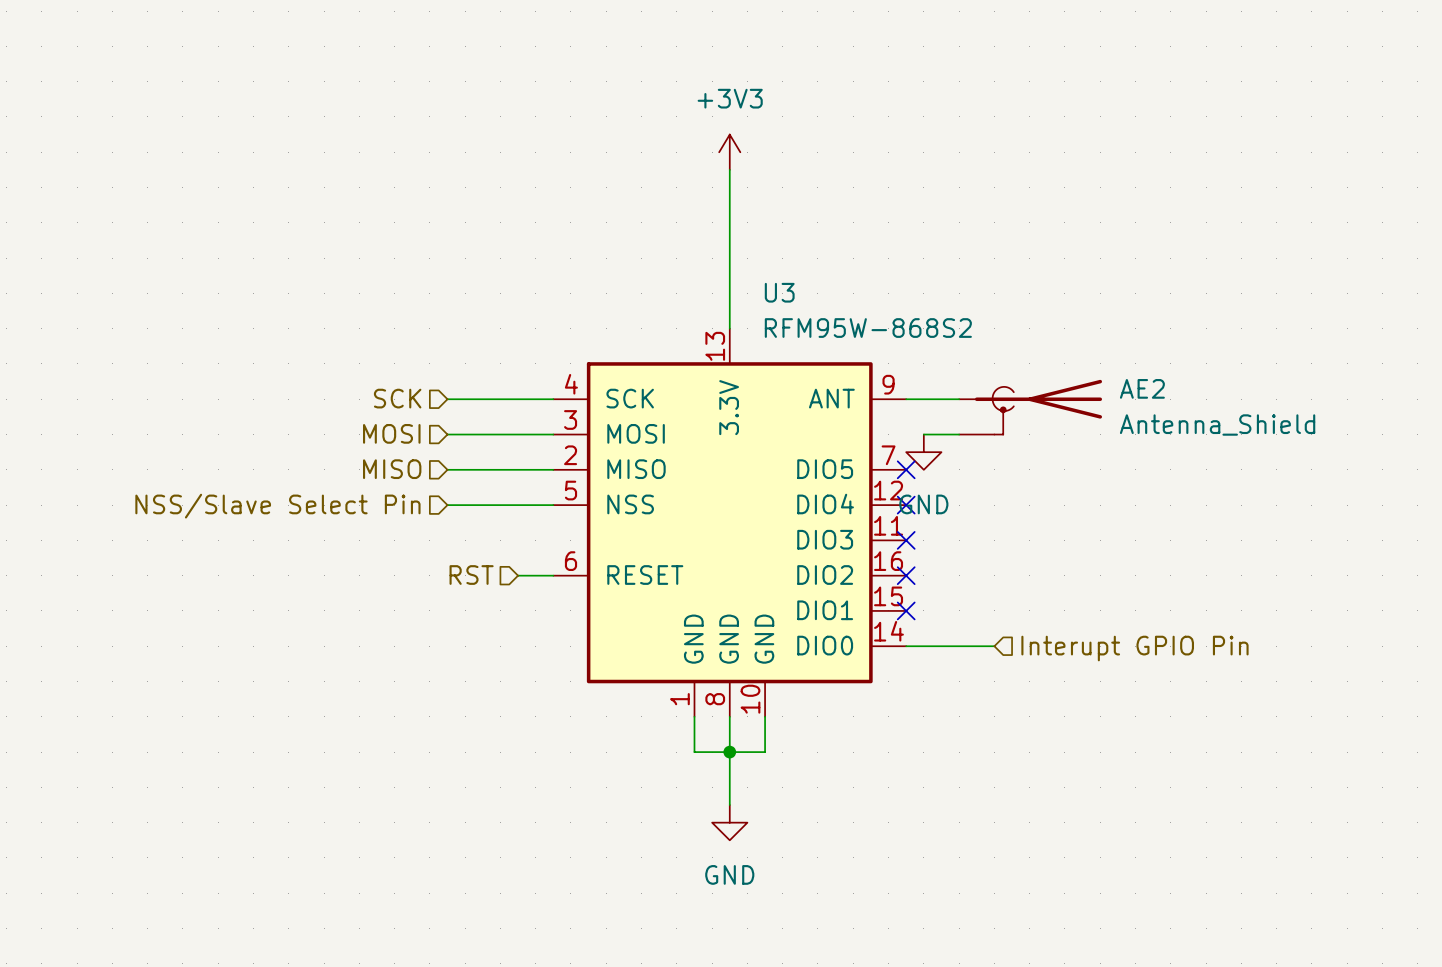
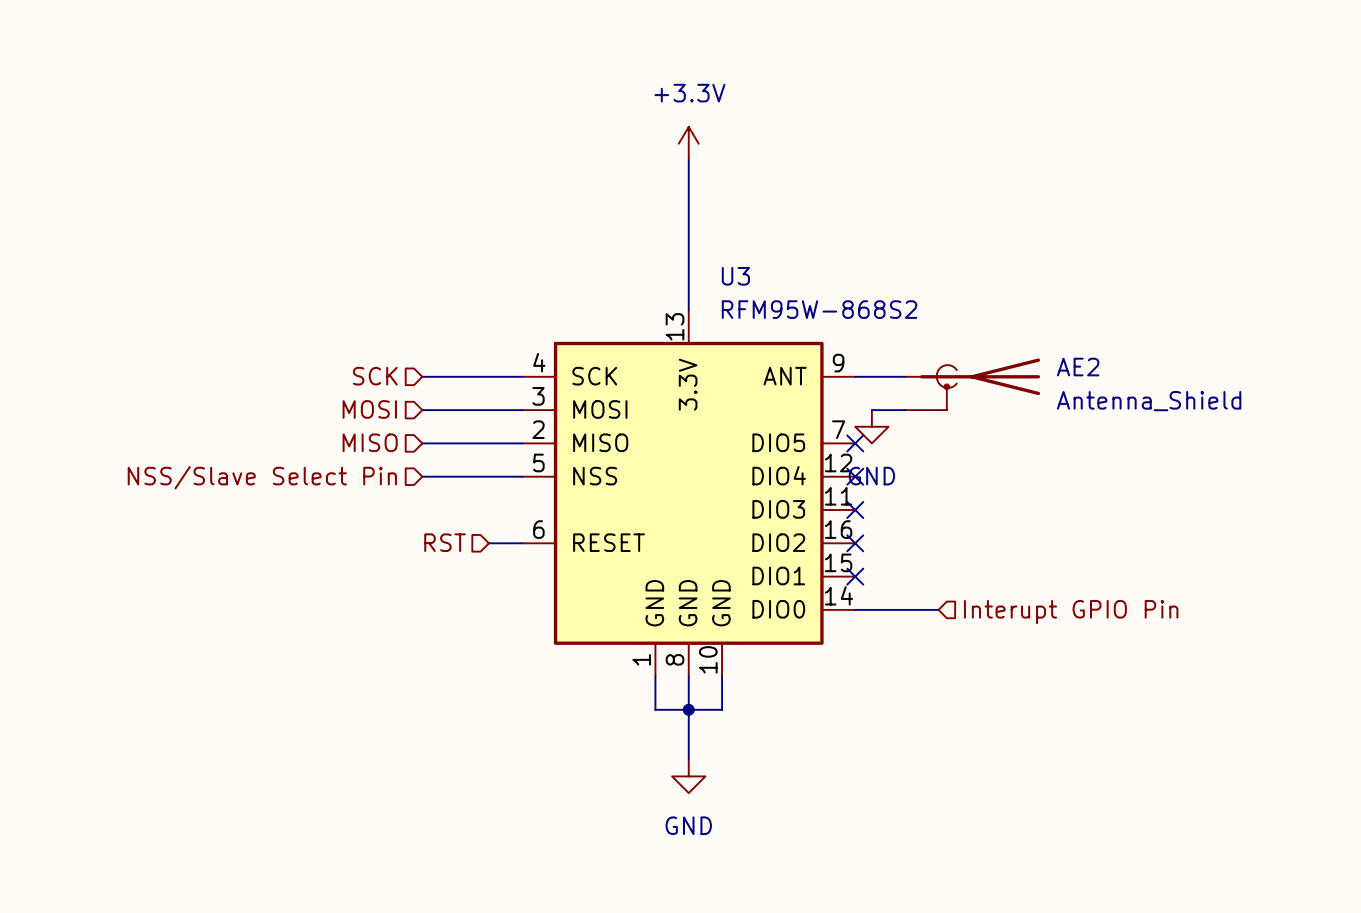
power symbol: +3V3 (729, 152) -> +3.3V (688, 143)

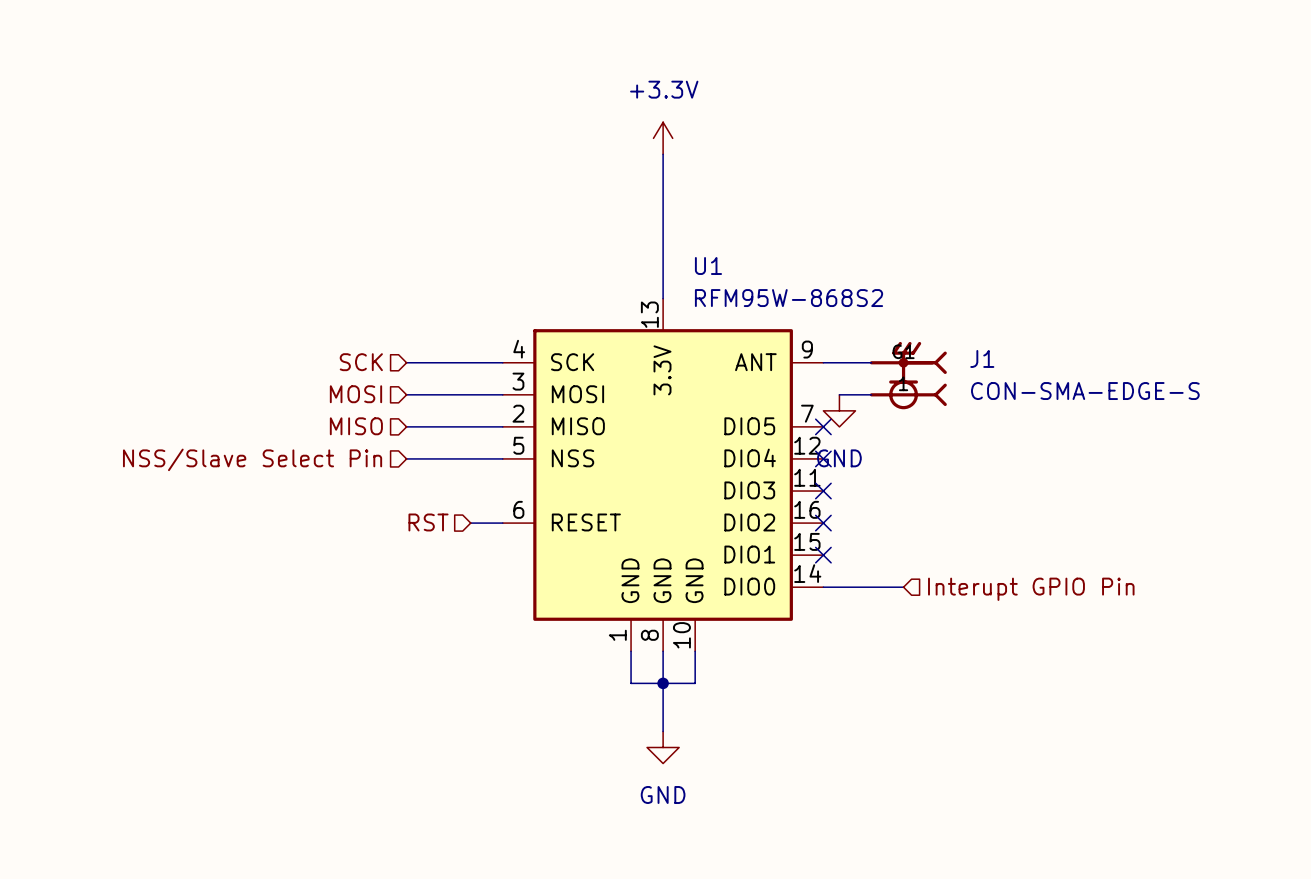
U3 name: U3 (735, 276) -> U1 (708, 265)
AE2: Antenna_Shield (972, 384) -> none
J1: none -> CON-SMA-EDGE-S (908, 375)

